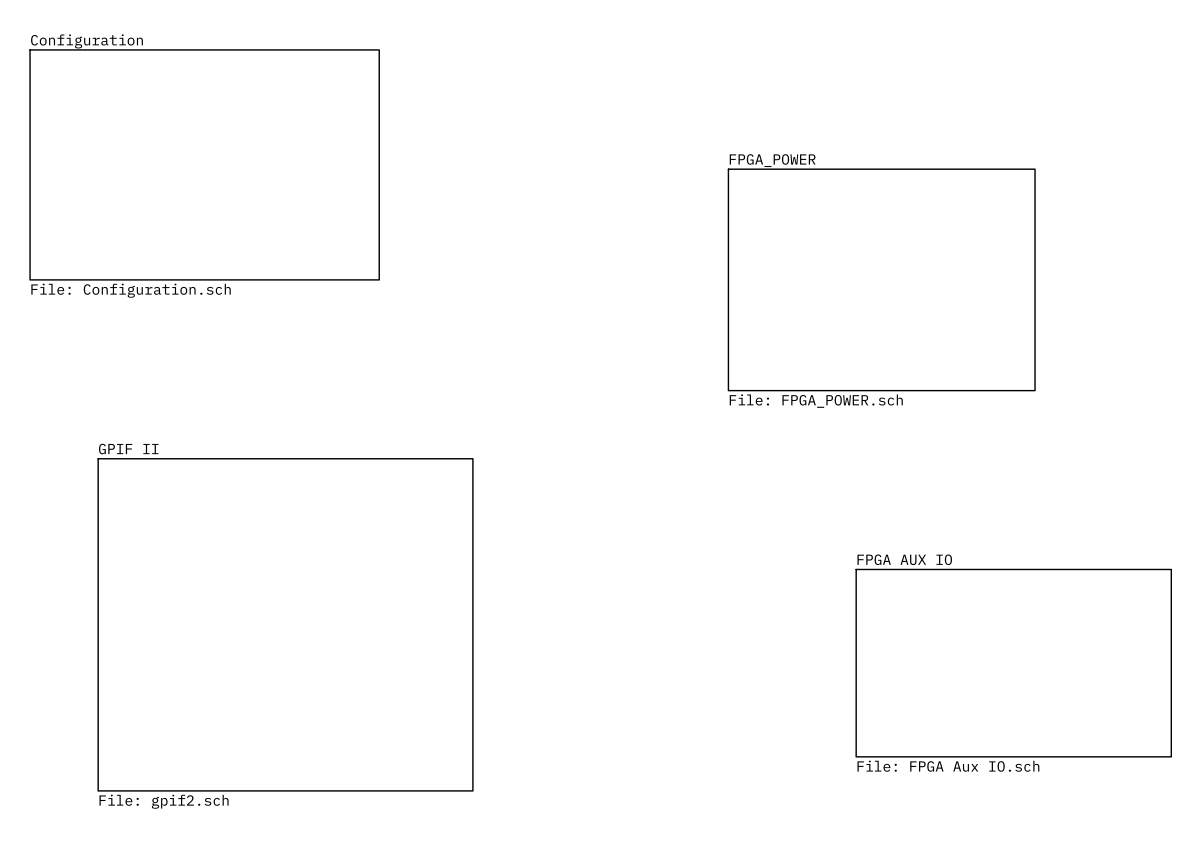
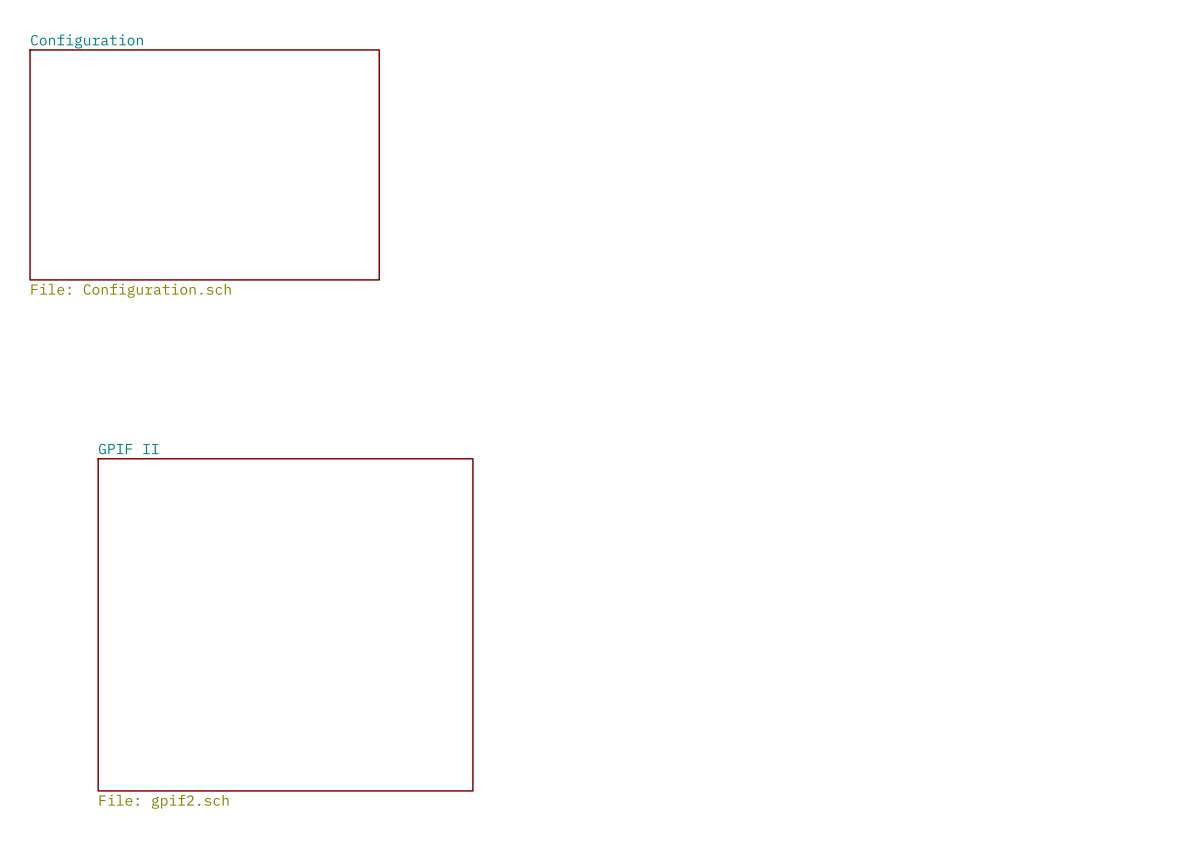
sheet FPGA_POWER: File: FPGA_POWER.sch (881, 279) -> none
sheet FPGA AUX IO: File: FPGA Aux IO.sch (1013, 663) -> none

